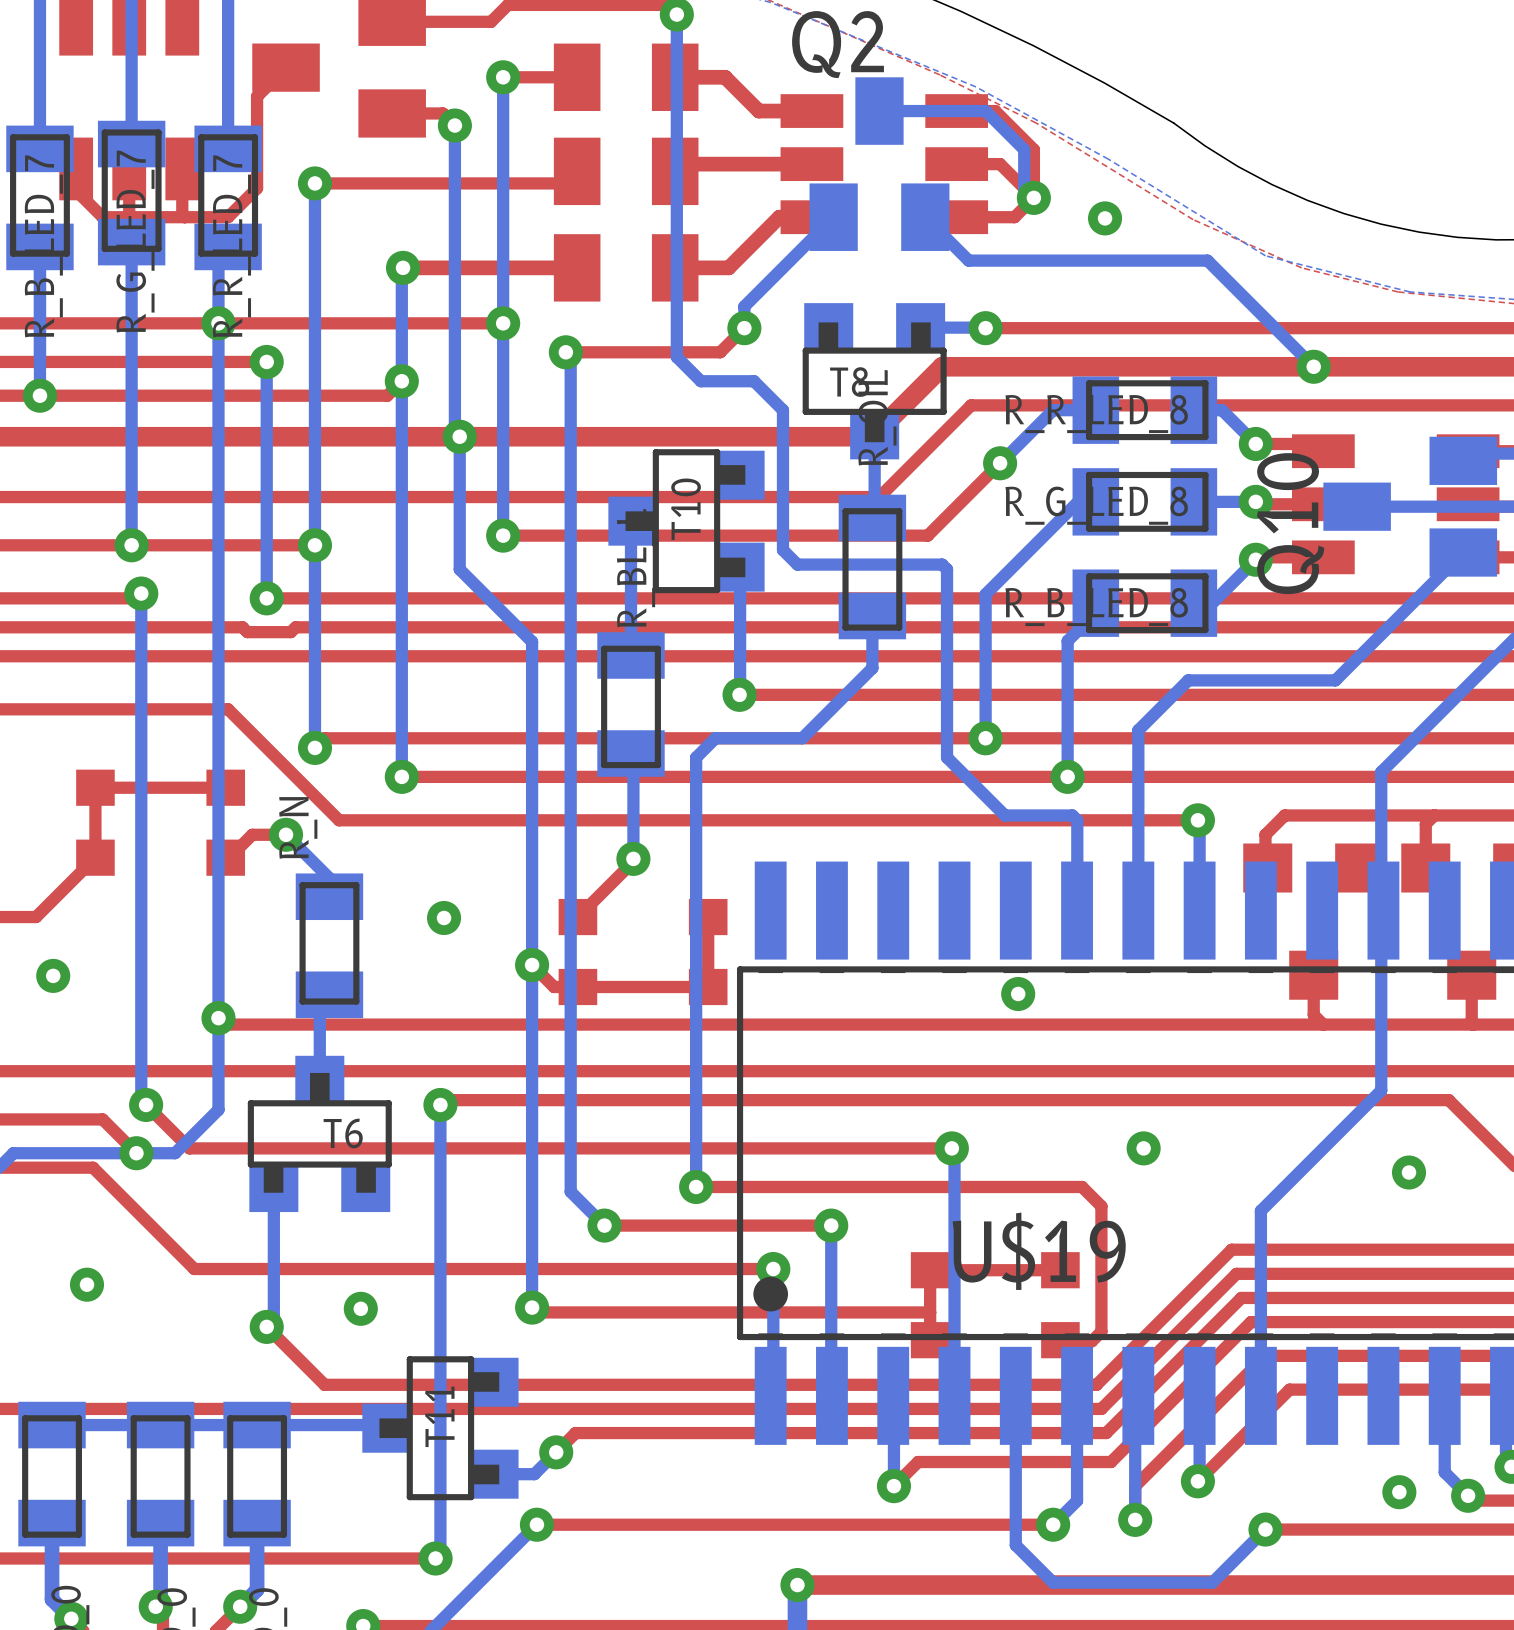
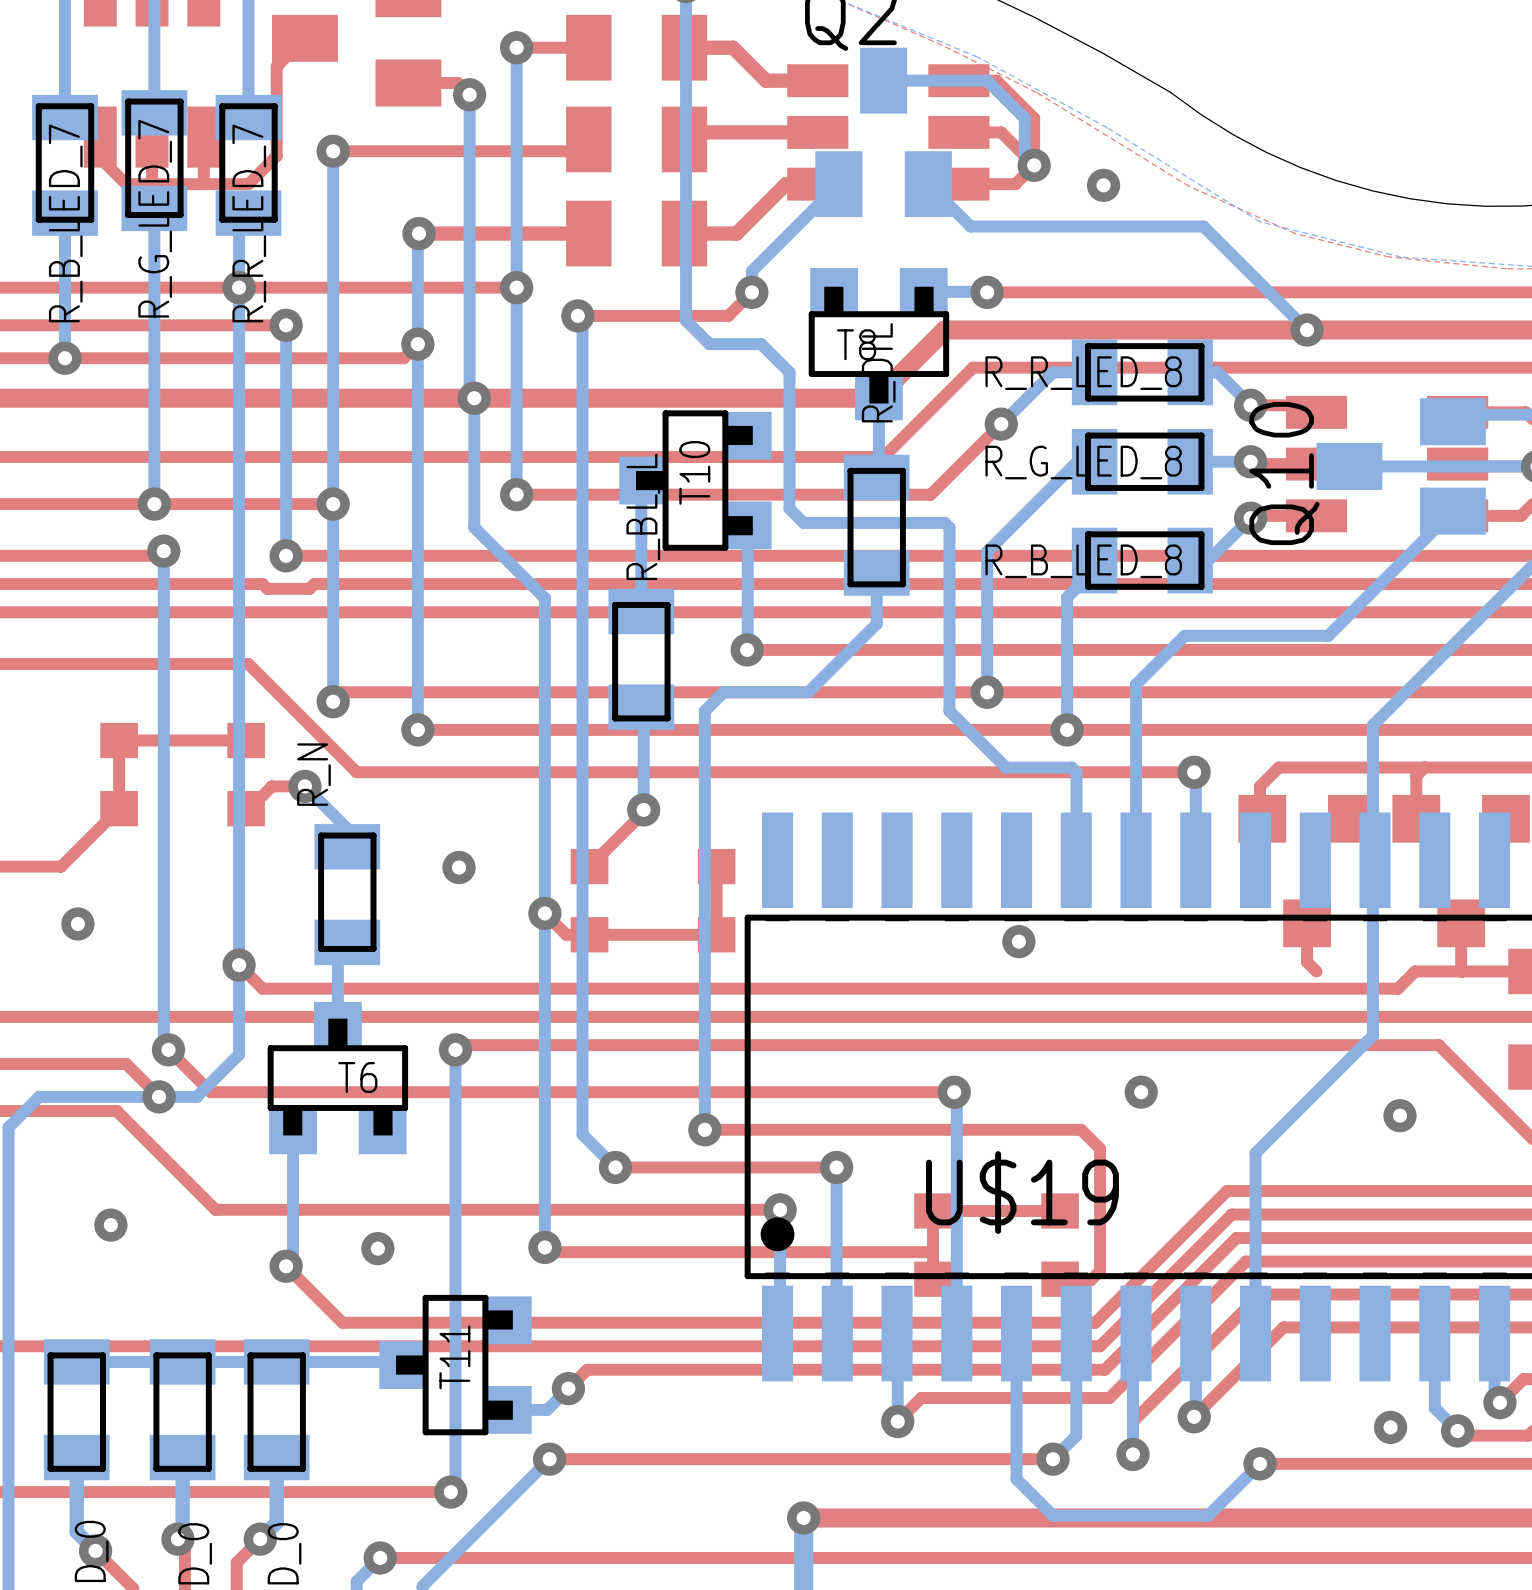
top track: (1424, 1024) (224, 1024) -> (1415, 971) (1397, 988) (262, 988) (245, 971)

